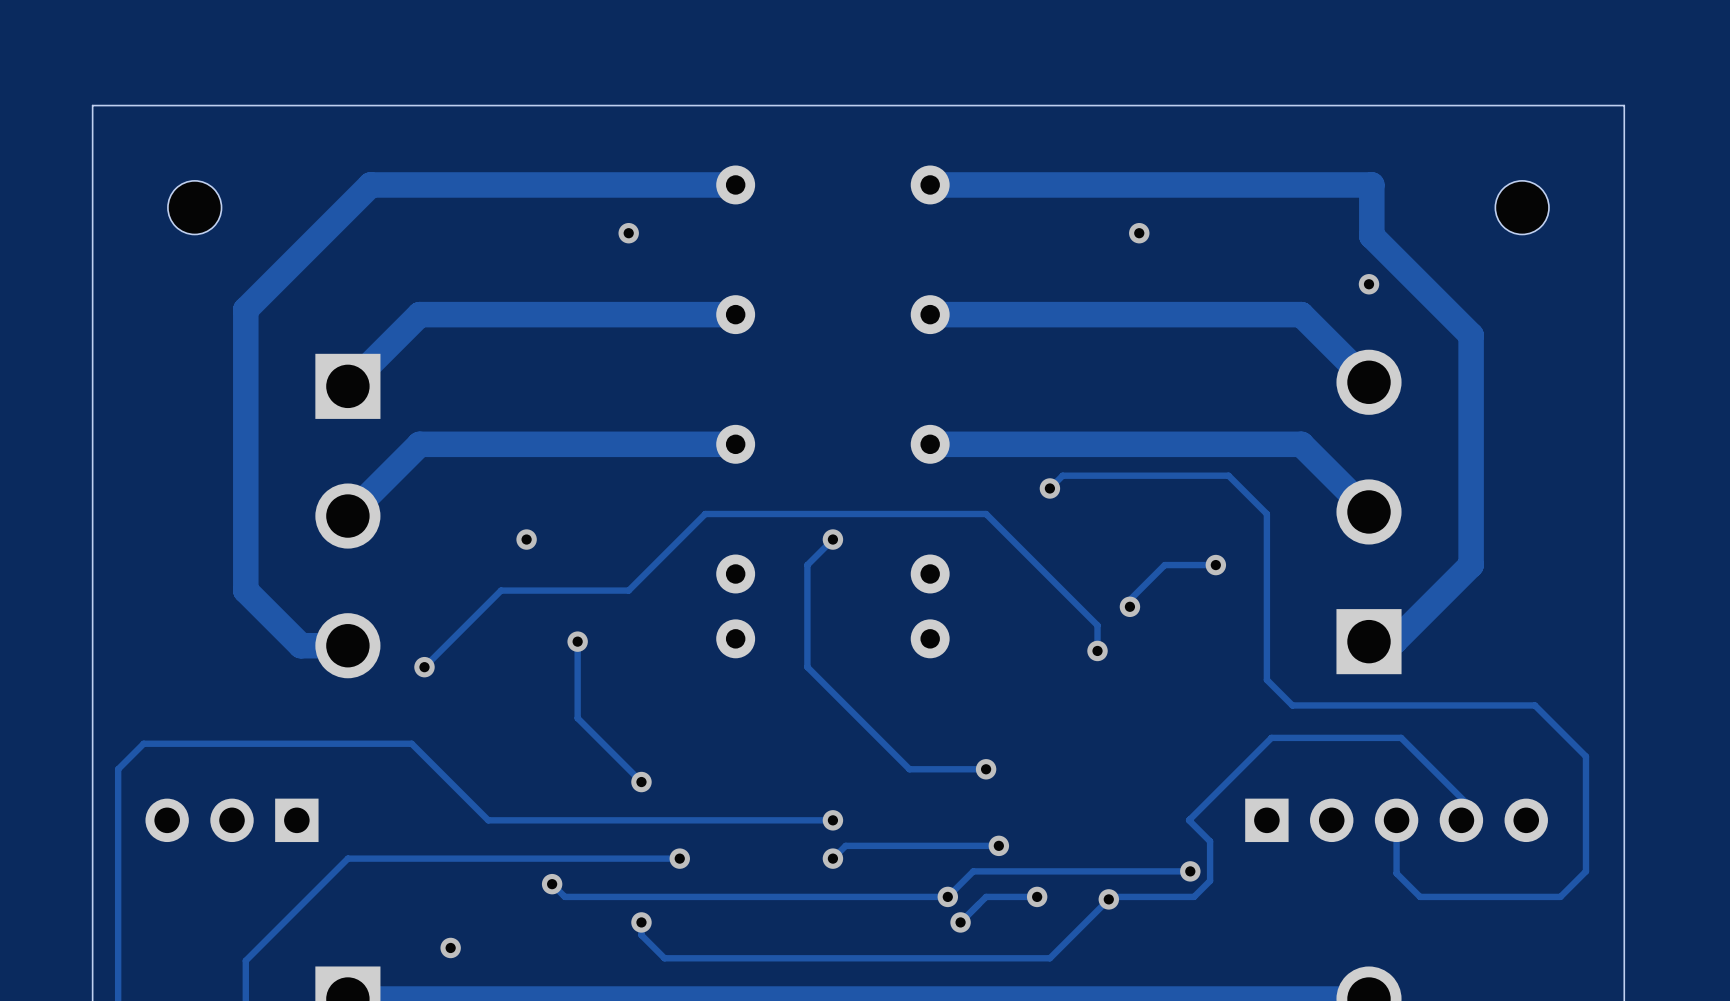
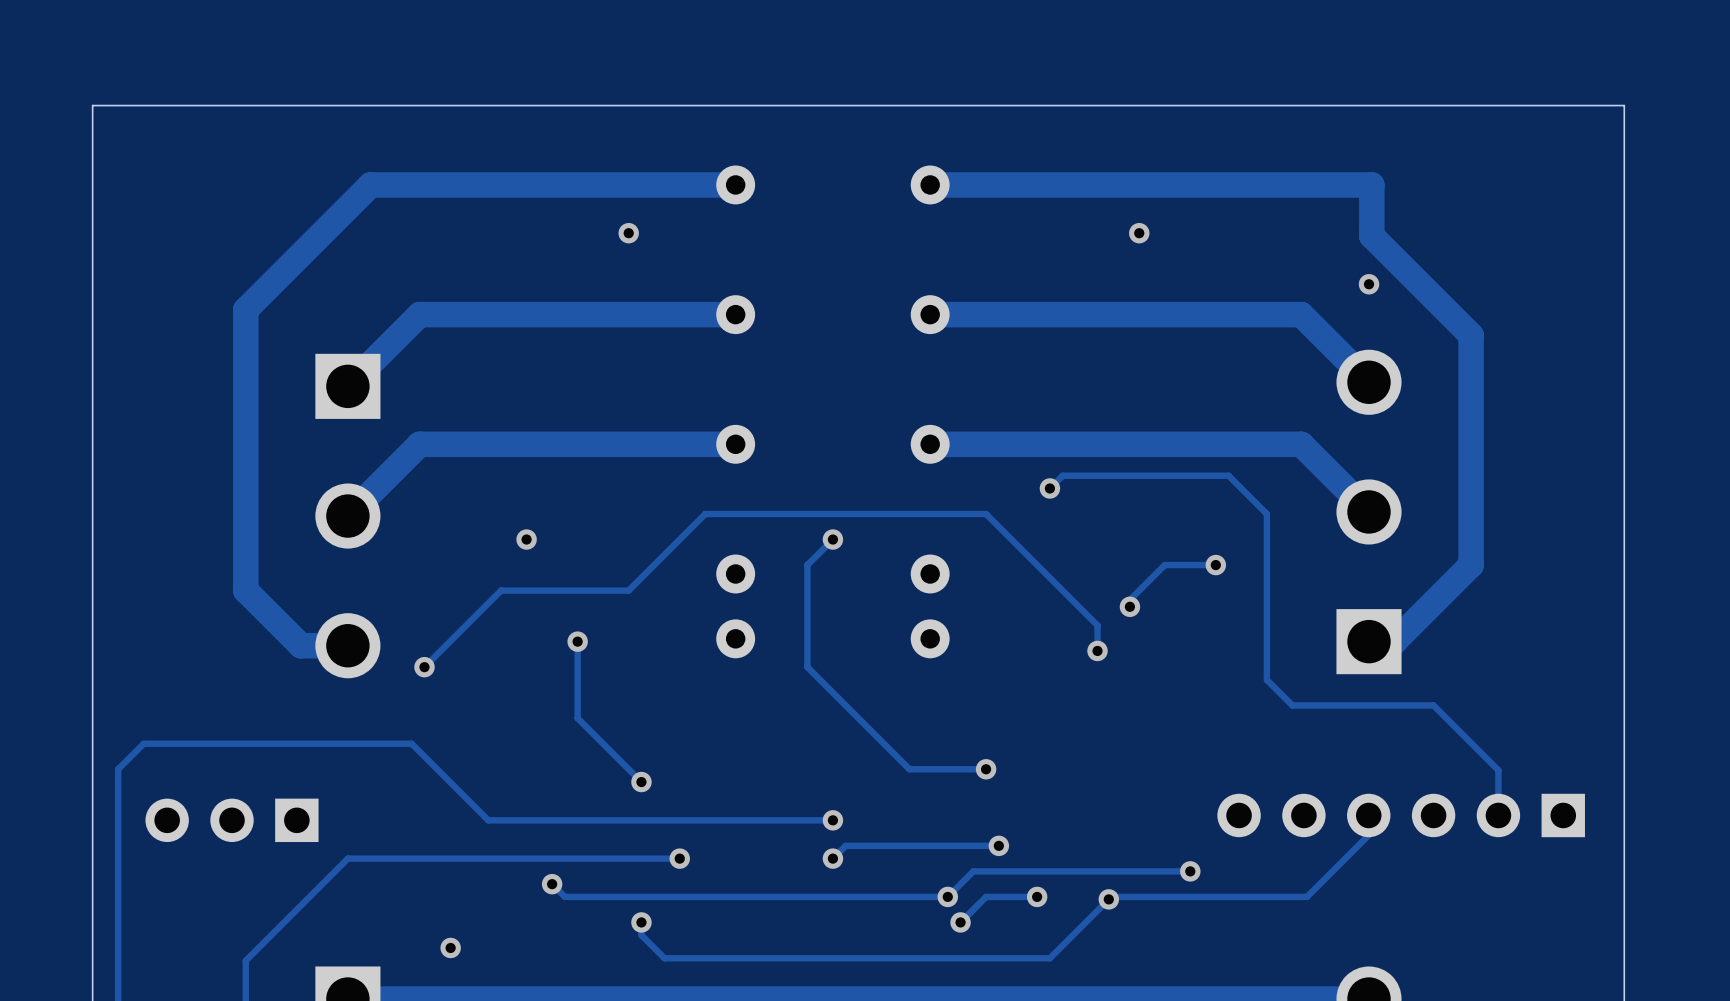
part: (194, 207) -> none
part: (1522, 207) -> none
track: (1433, 705) (1534, 705) (1585, 756) (1585, 871) (1560, 896) (1420, 896) (1396, 873) (1396, 820) -> (1433, 705) (1498, 770) (1498, 815)
part footprint: [1245, 798, 1548, 843] -> [1217, 793, 1585, 838]
track: (1461, 820) (1461, 807) (1466, 802) (1401, 737) (1271, 737) (1189, 820) (1210, 841) (1210, 880) (1194, 896) -> (1368, 815) (1368, 835) (1306, 896) (1194, 896)

